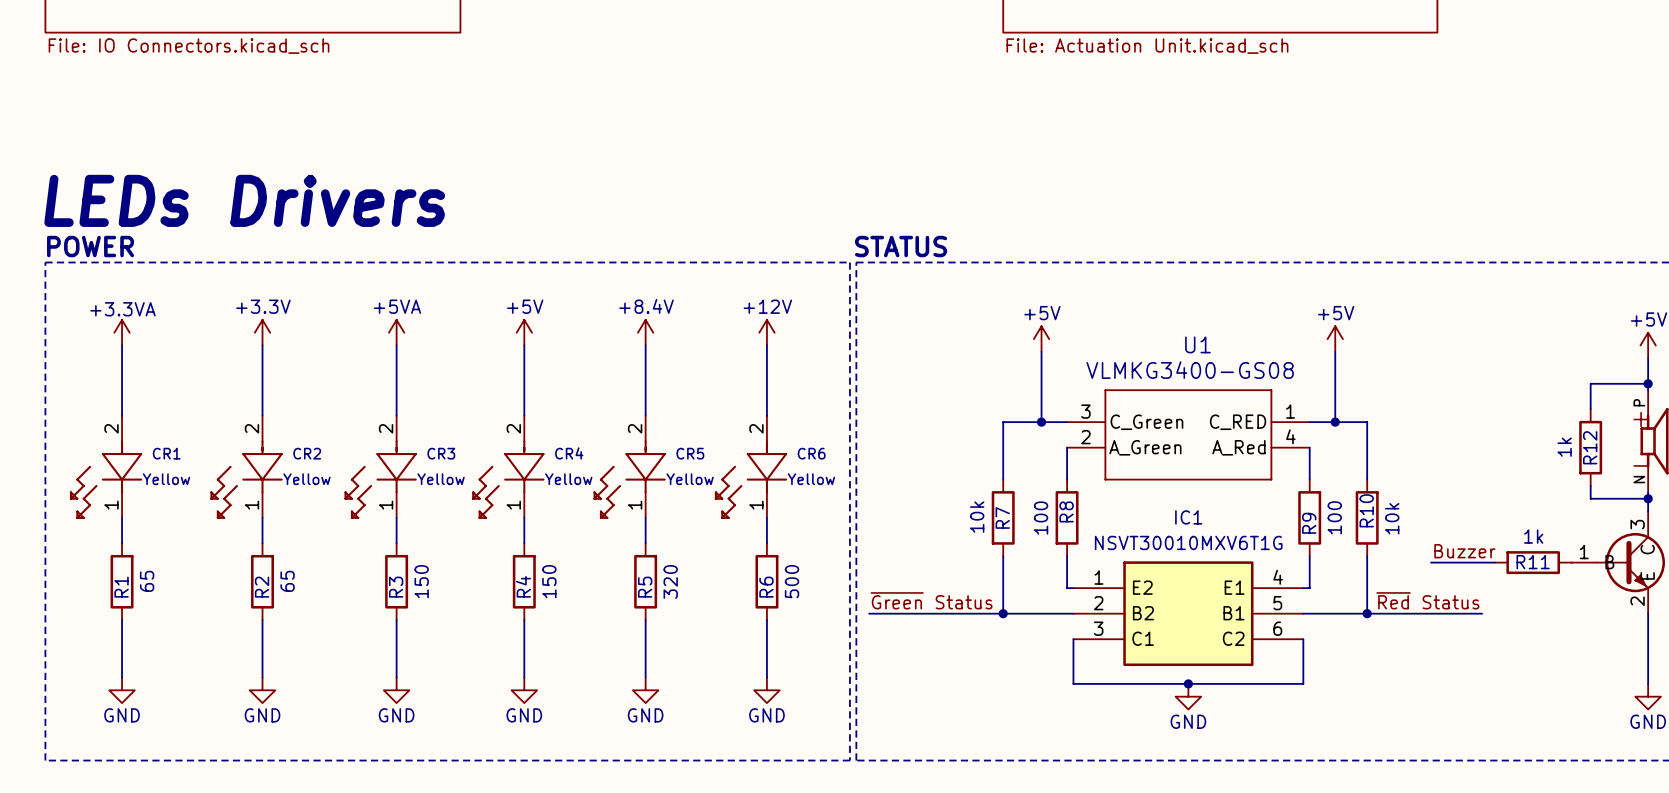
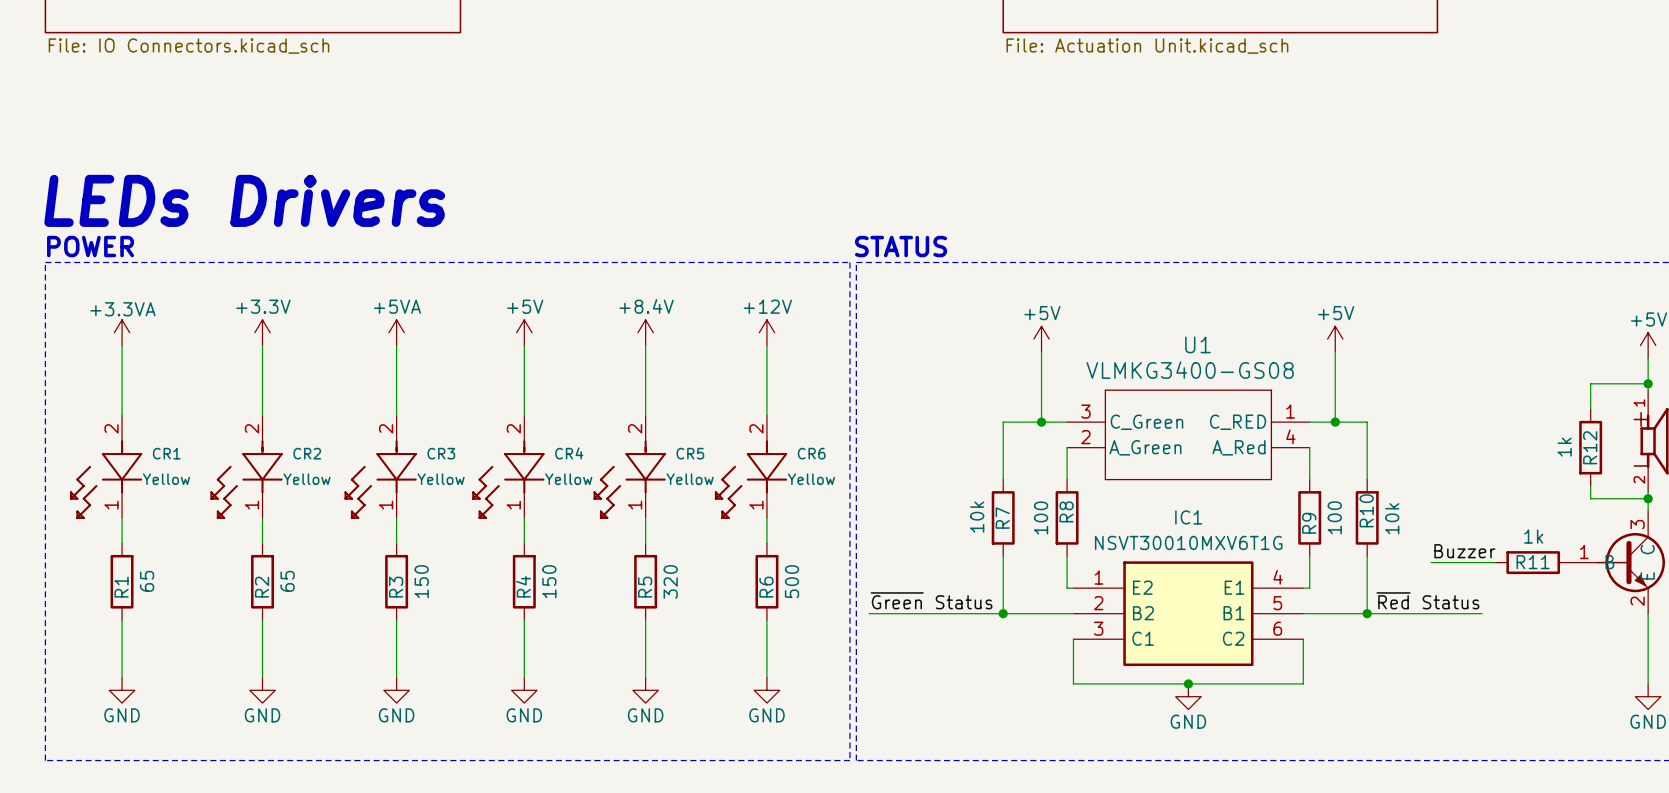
part pin number: P (1639, 402) -> 1 (1639, 402)
part pin number: N (1639, 479) -> 2 (1639, 479)

